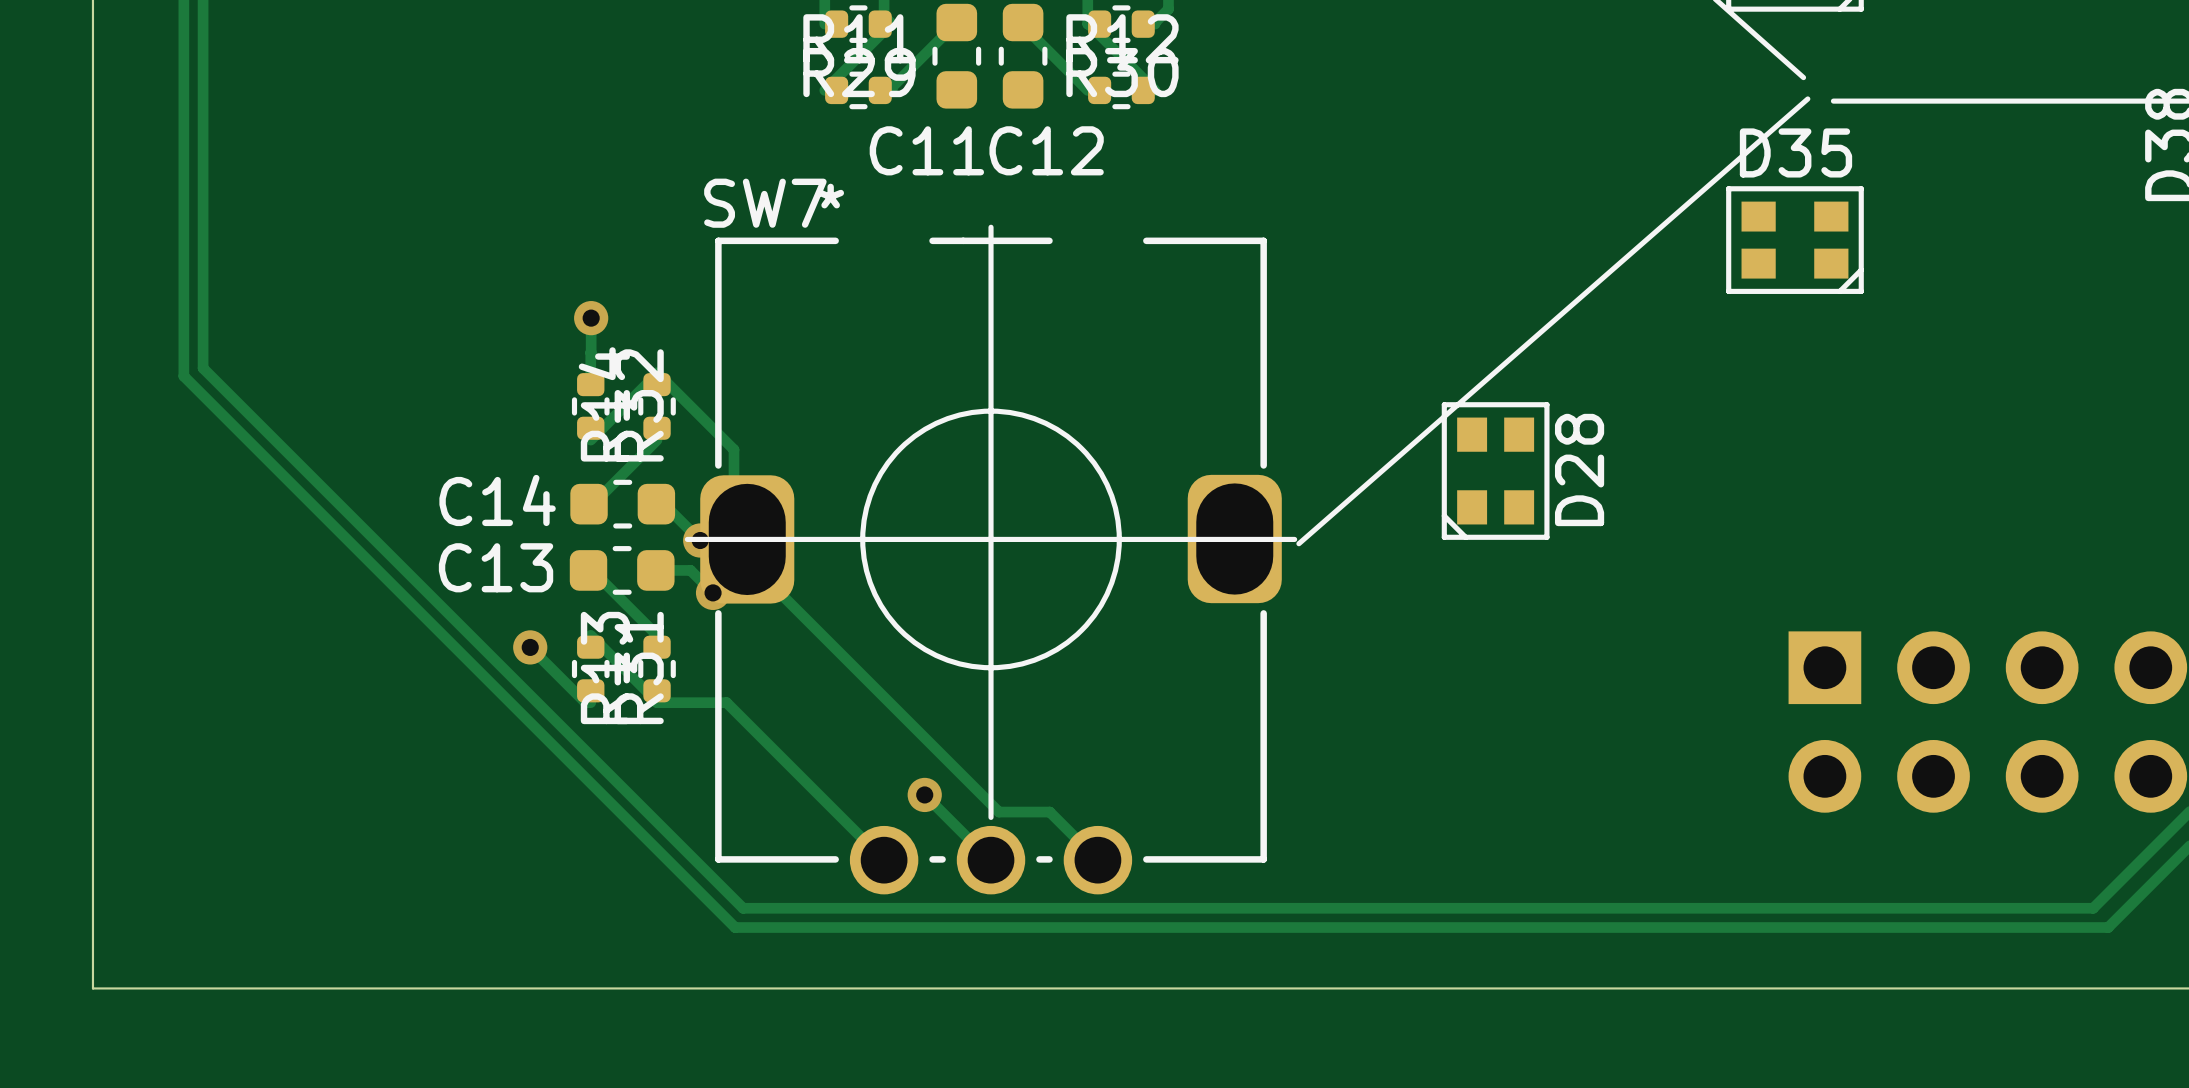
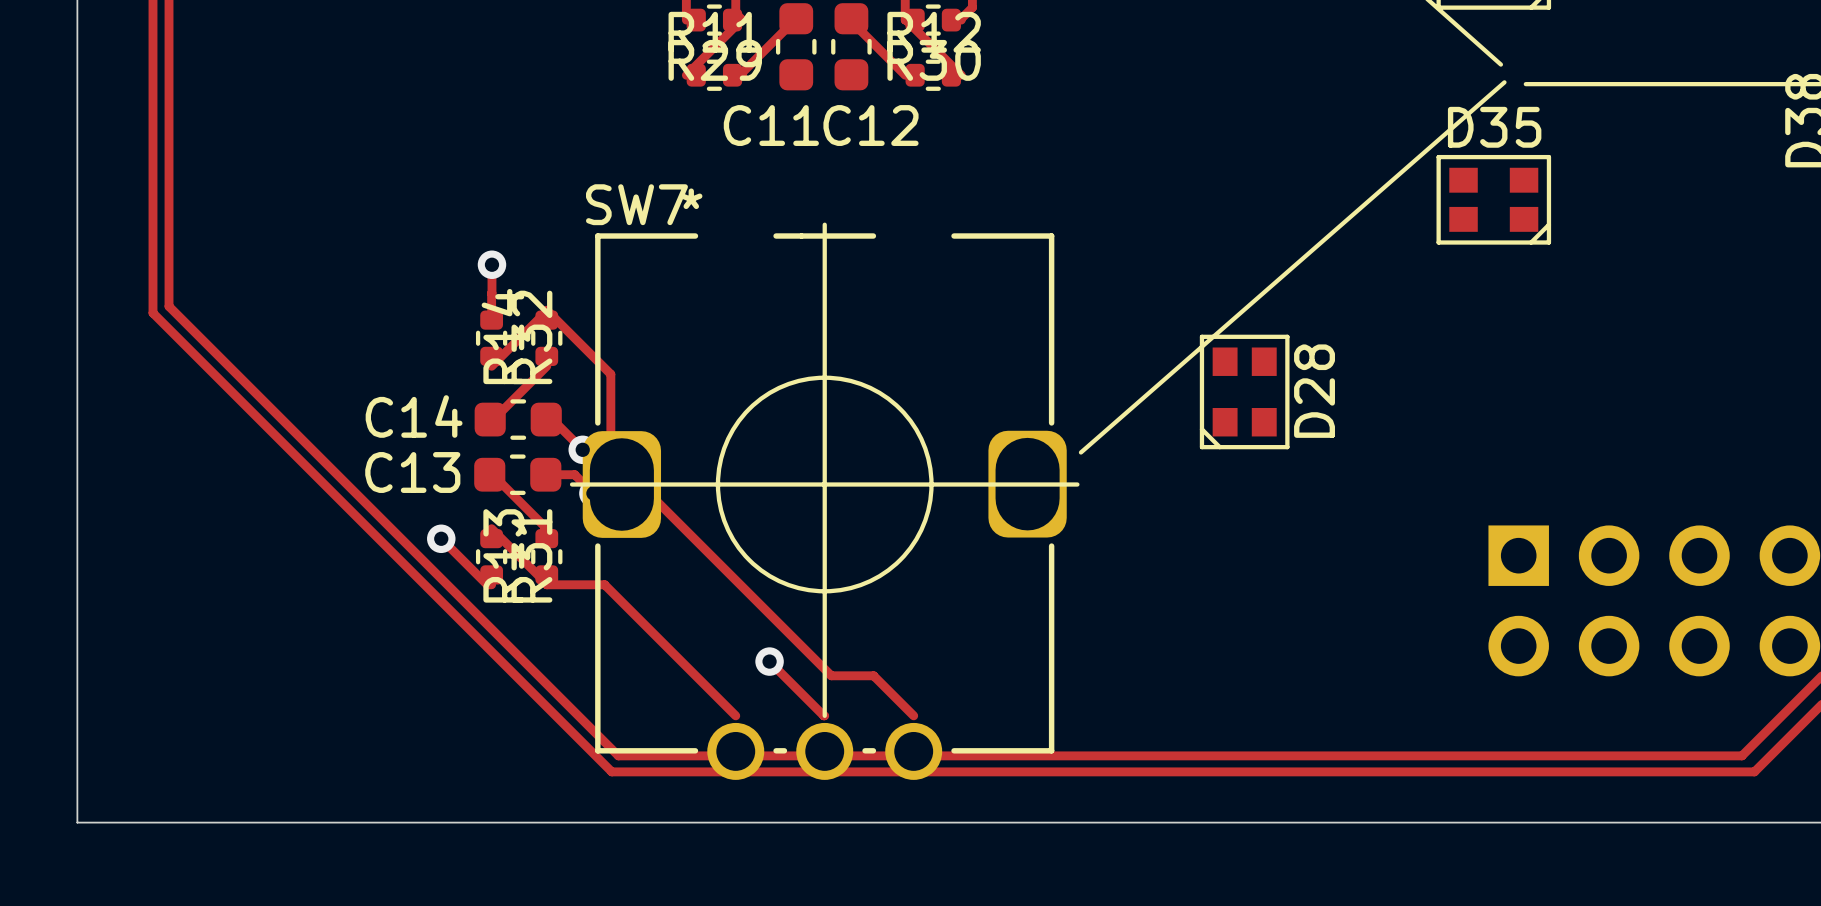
SW7 position: (991, 559) -> (824, 501)

